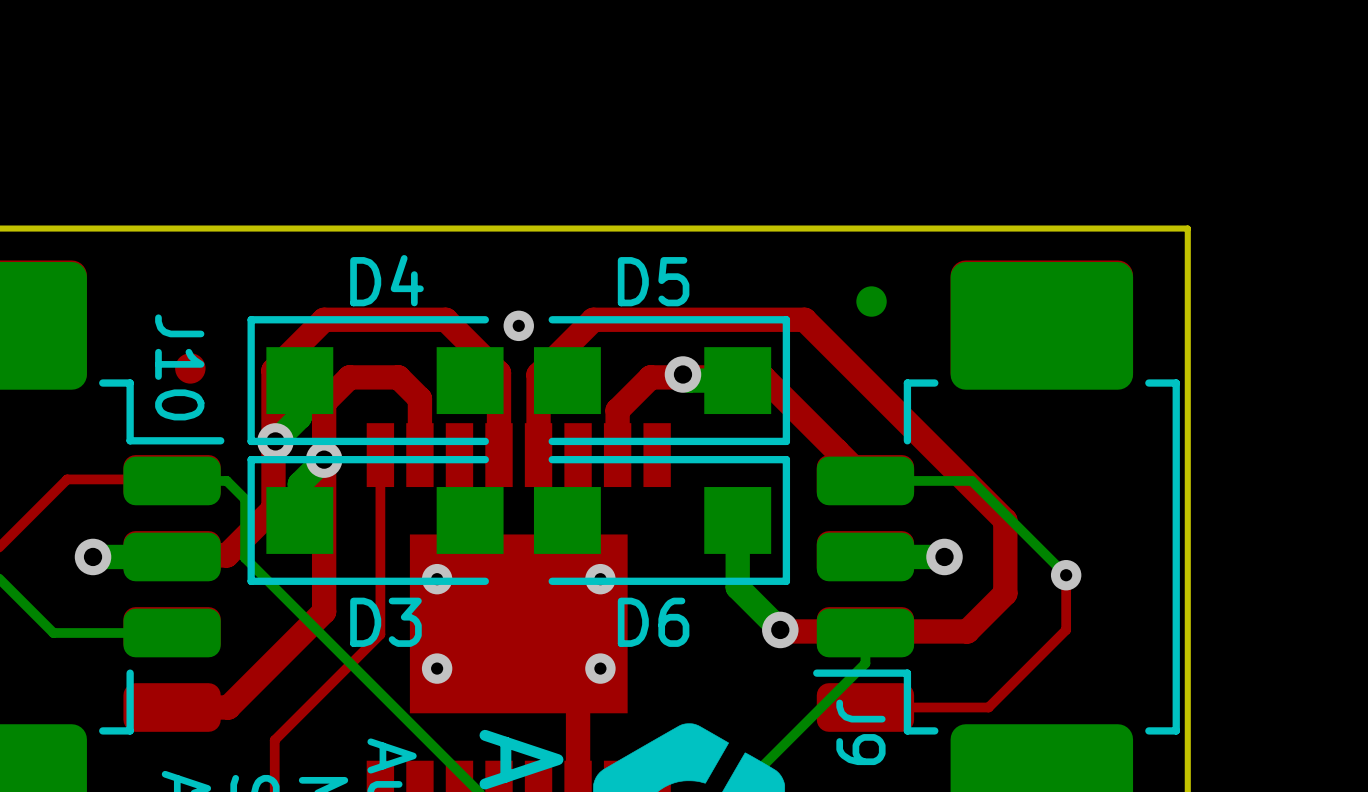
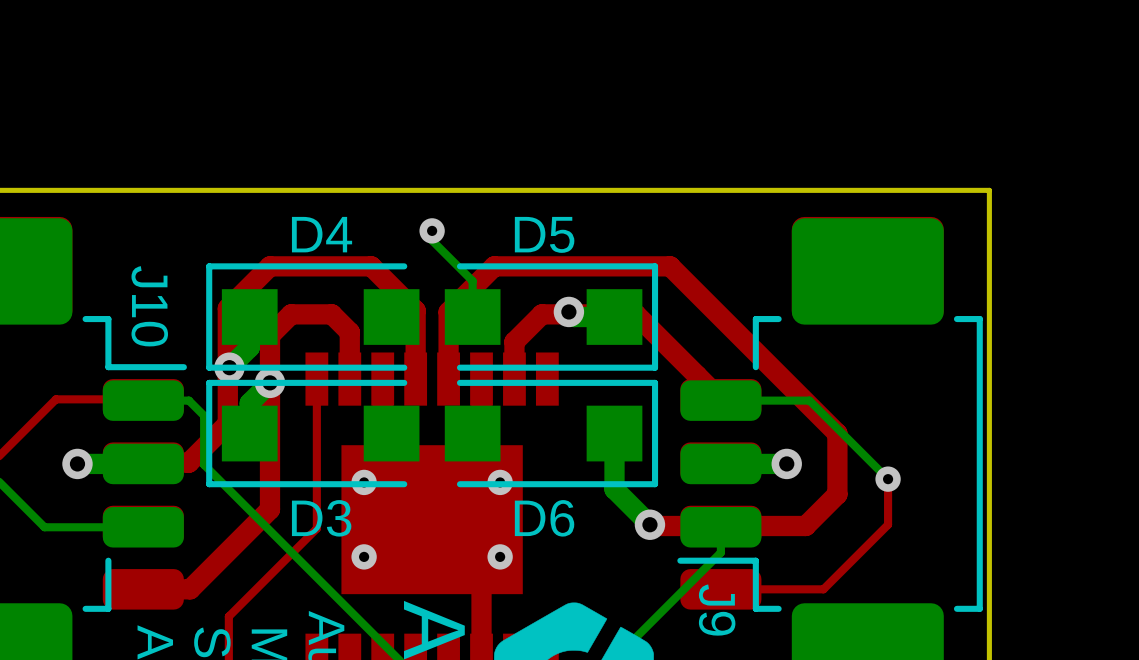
bottom track: none -> (432, 230) (432, 240) (472, 281) (472, 317)
part: (871, 301) -> none
via position: (518, 325) -> (432, 230)
part: (190, 368) -> none

